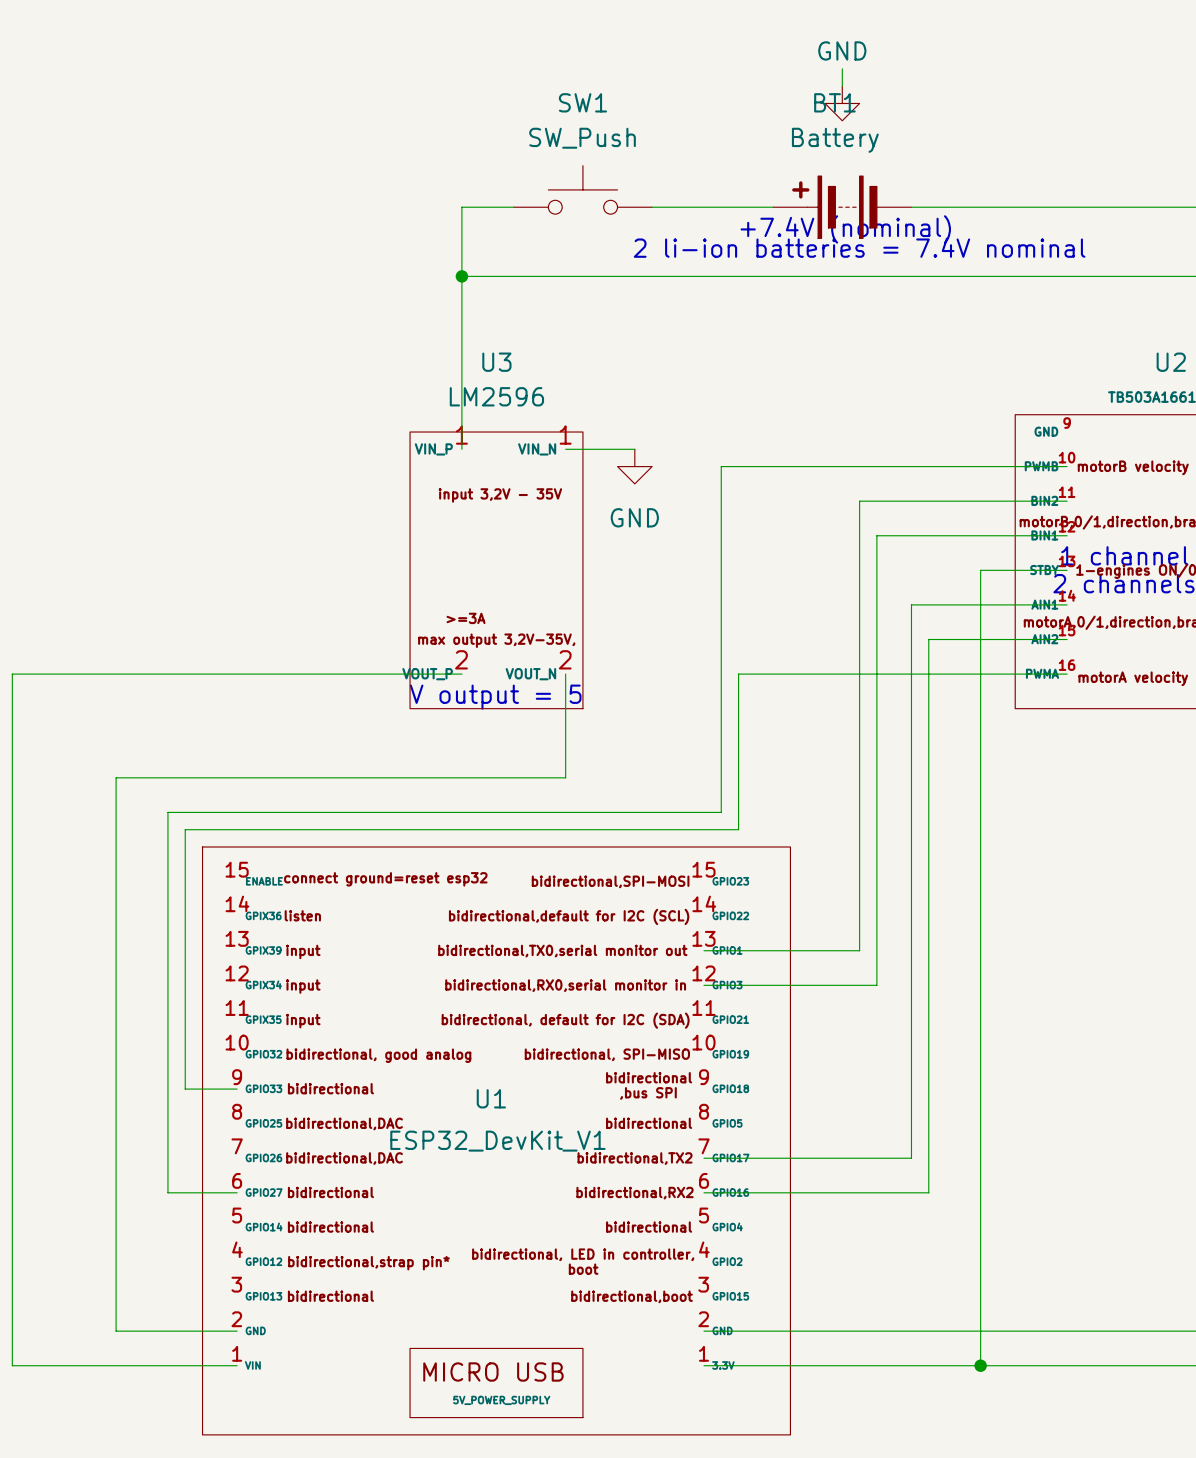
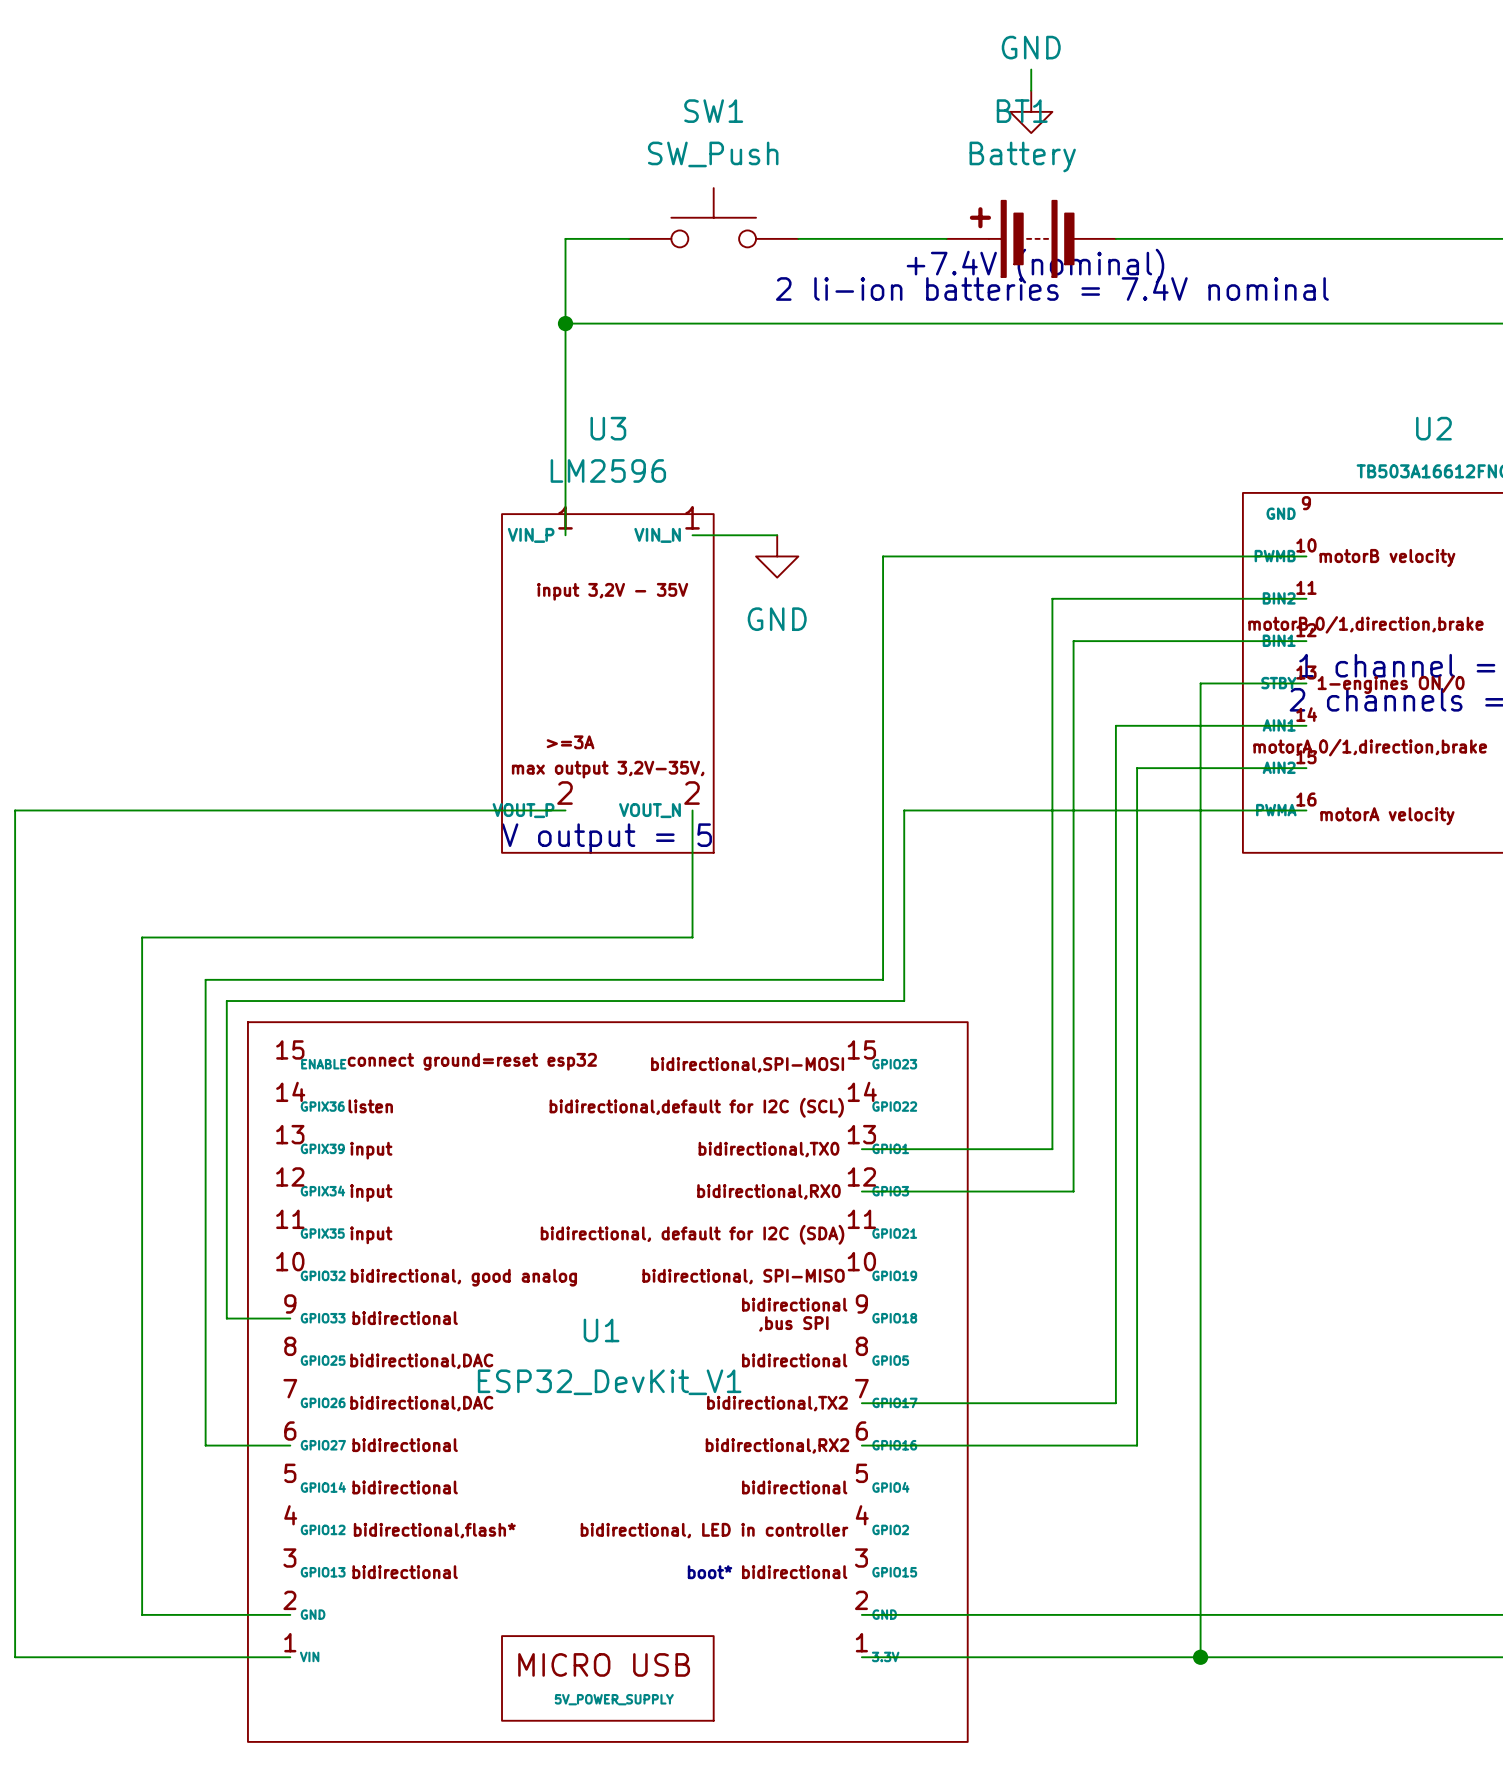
U1 symbol: [202, 846, 791, 1435] -> [247, 1022, 968, 1742]
text: none -> boot* (710, 1572)

